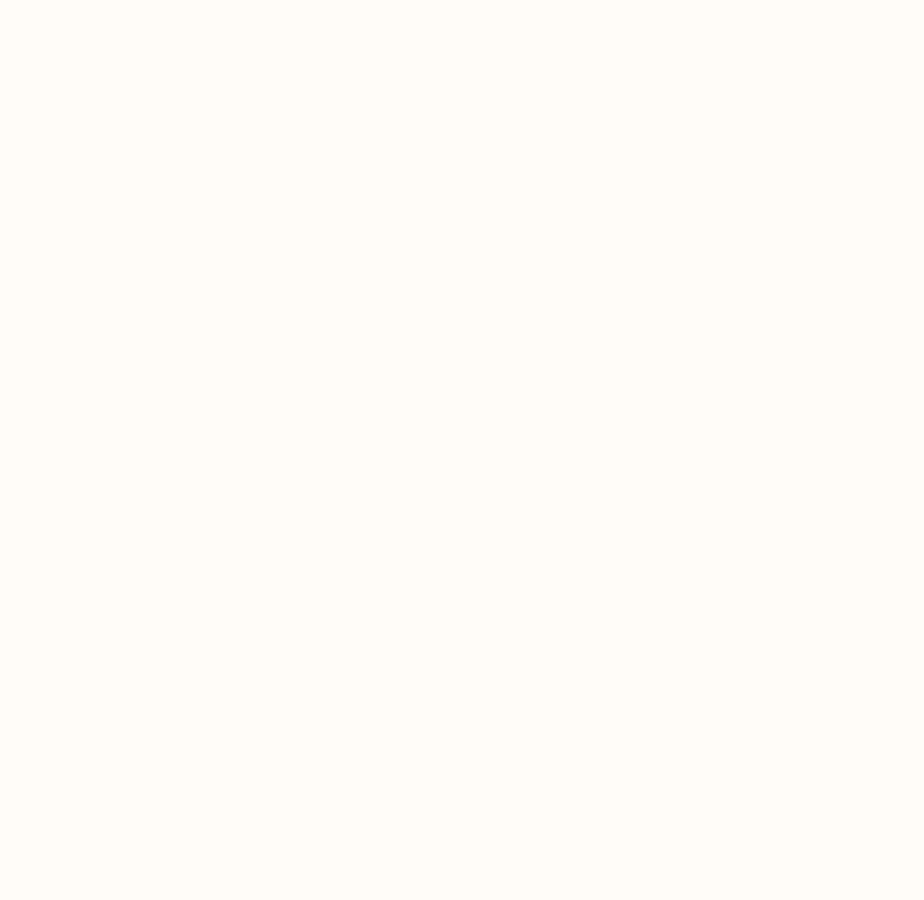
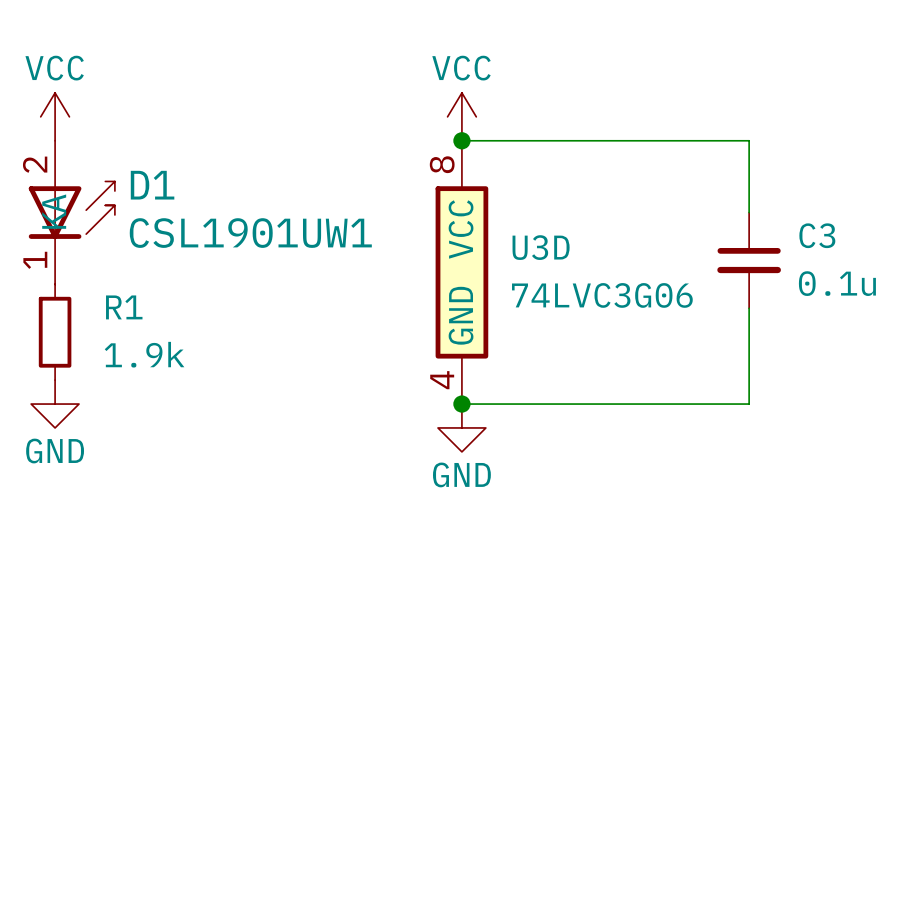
power symbol: none -> VCC (55, 116)
power symbol: none -> VCC (461, 116)
wire: none -> (461, 140) (749, 140) (749, 212)
junction: none -> (461, 140)
D1: none -> CSL1901UW1 (71, 212)
C3: none -> 0.1u (749, 260)
U3D: none -> 74LVC3G06 (461, 272)
wire: none -> (749, 308) (749, 404) (461, 404)
R1: none -> 1.9k (55, 332)
power symbol: none -> GND (55, 404)
junction: none -> (461, 404)
power symbol: none -> GND (461, 427)

